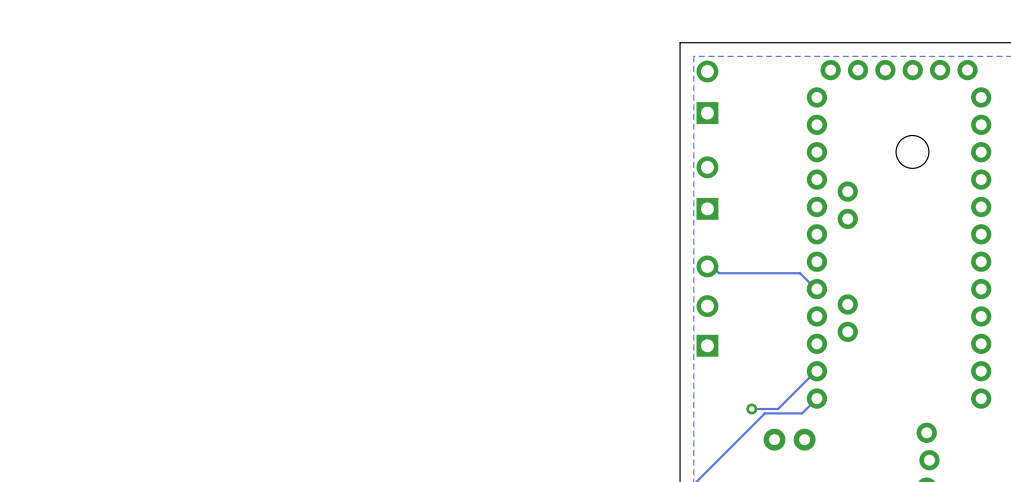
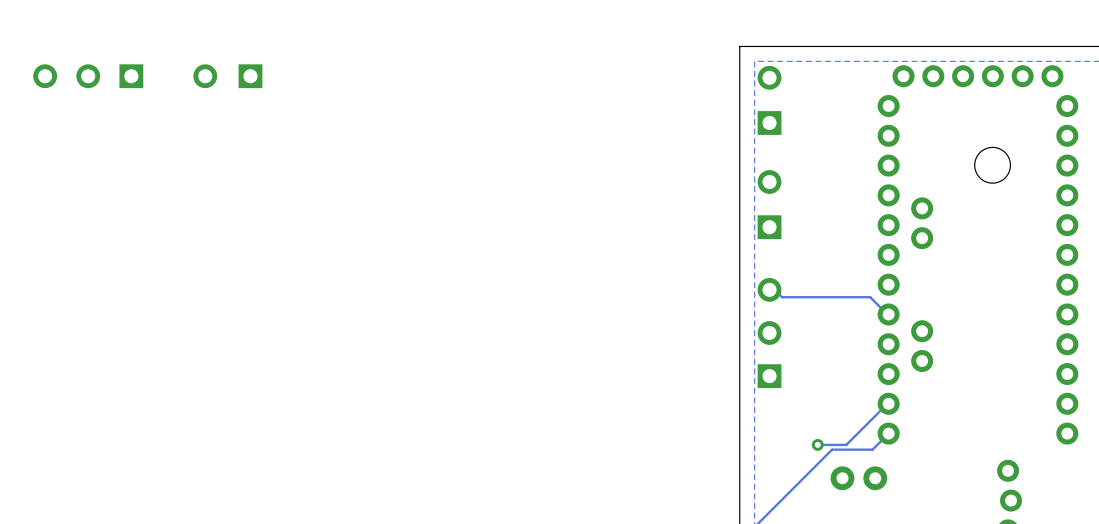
part: none -> (88, 76)
part: none -> (227, 76)

